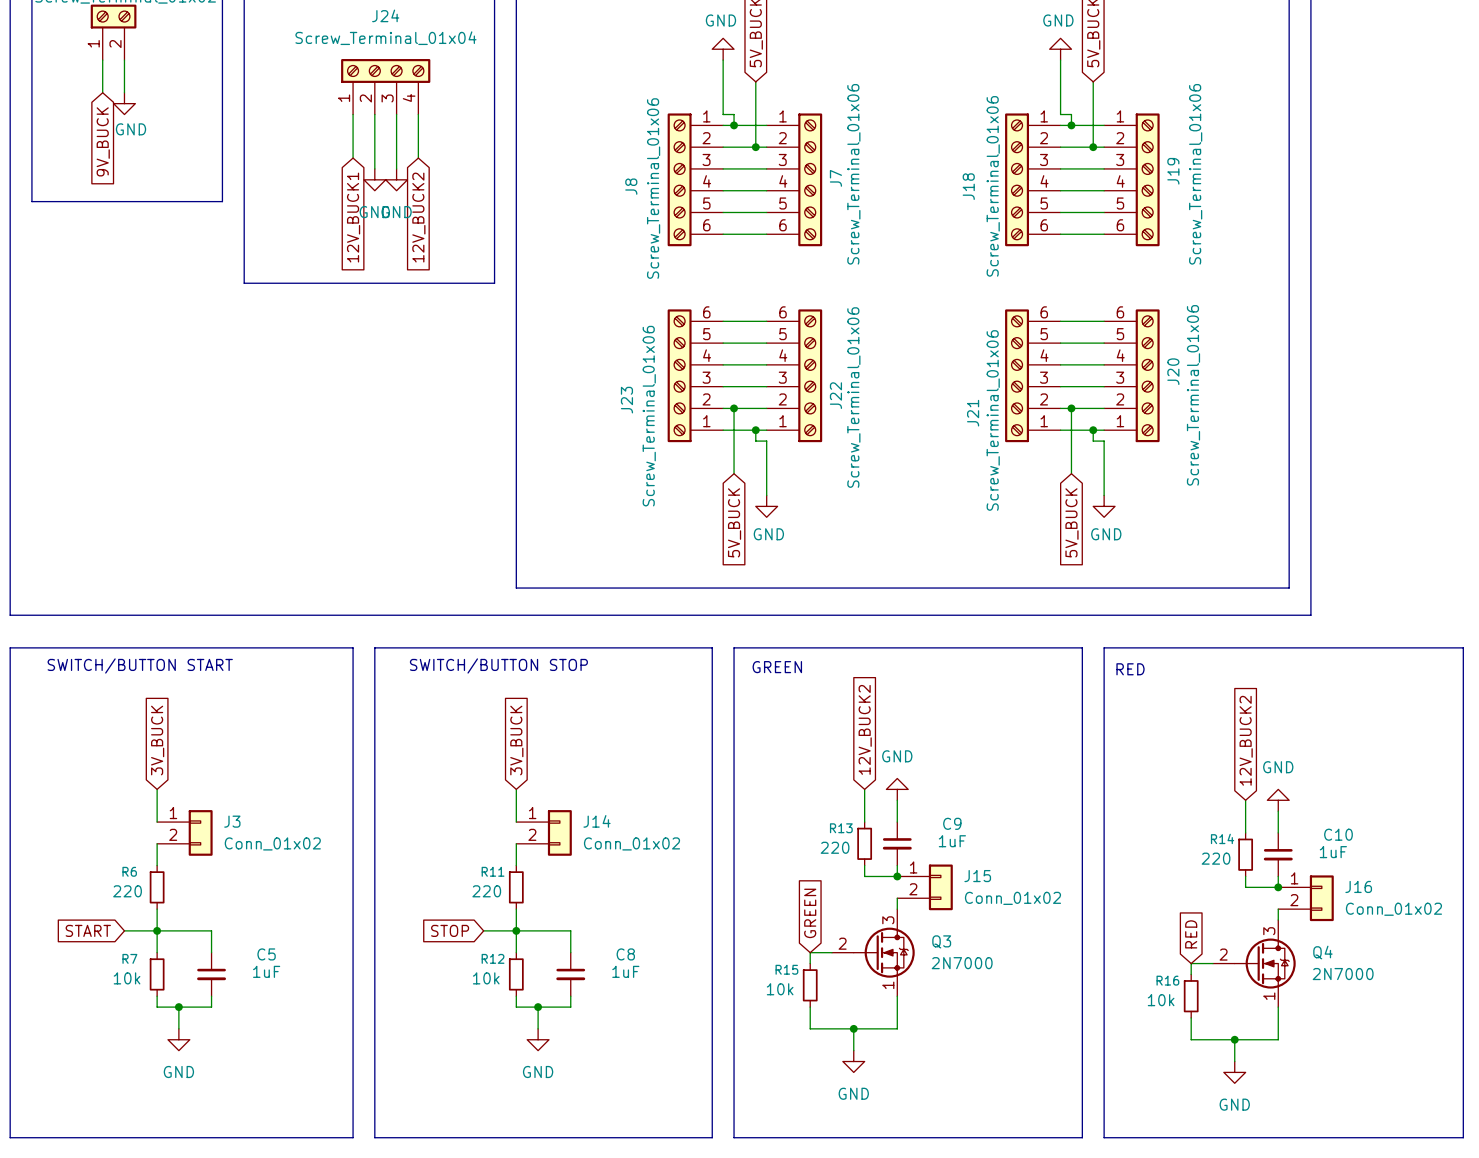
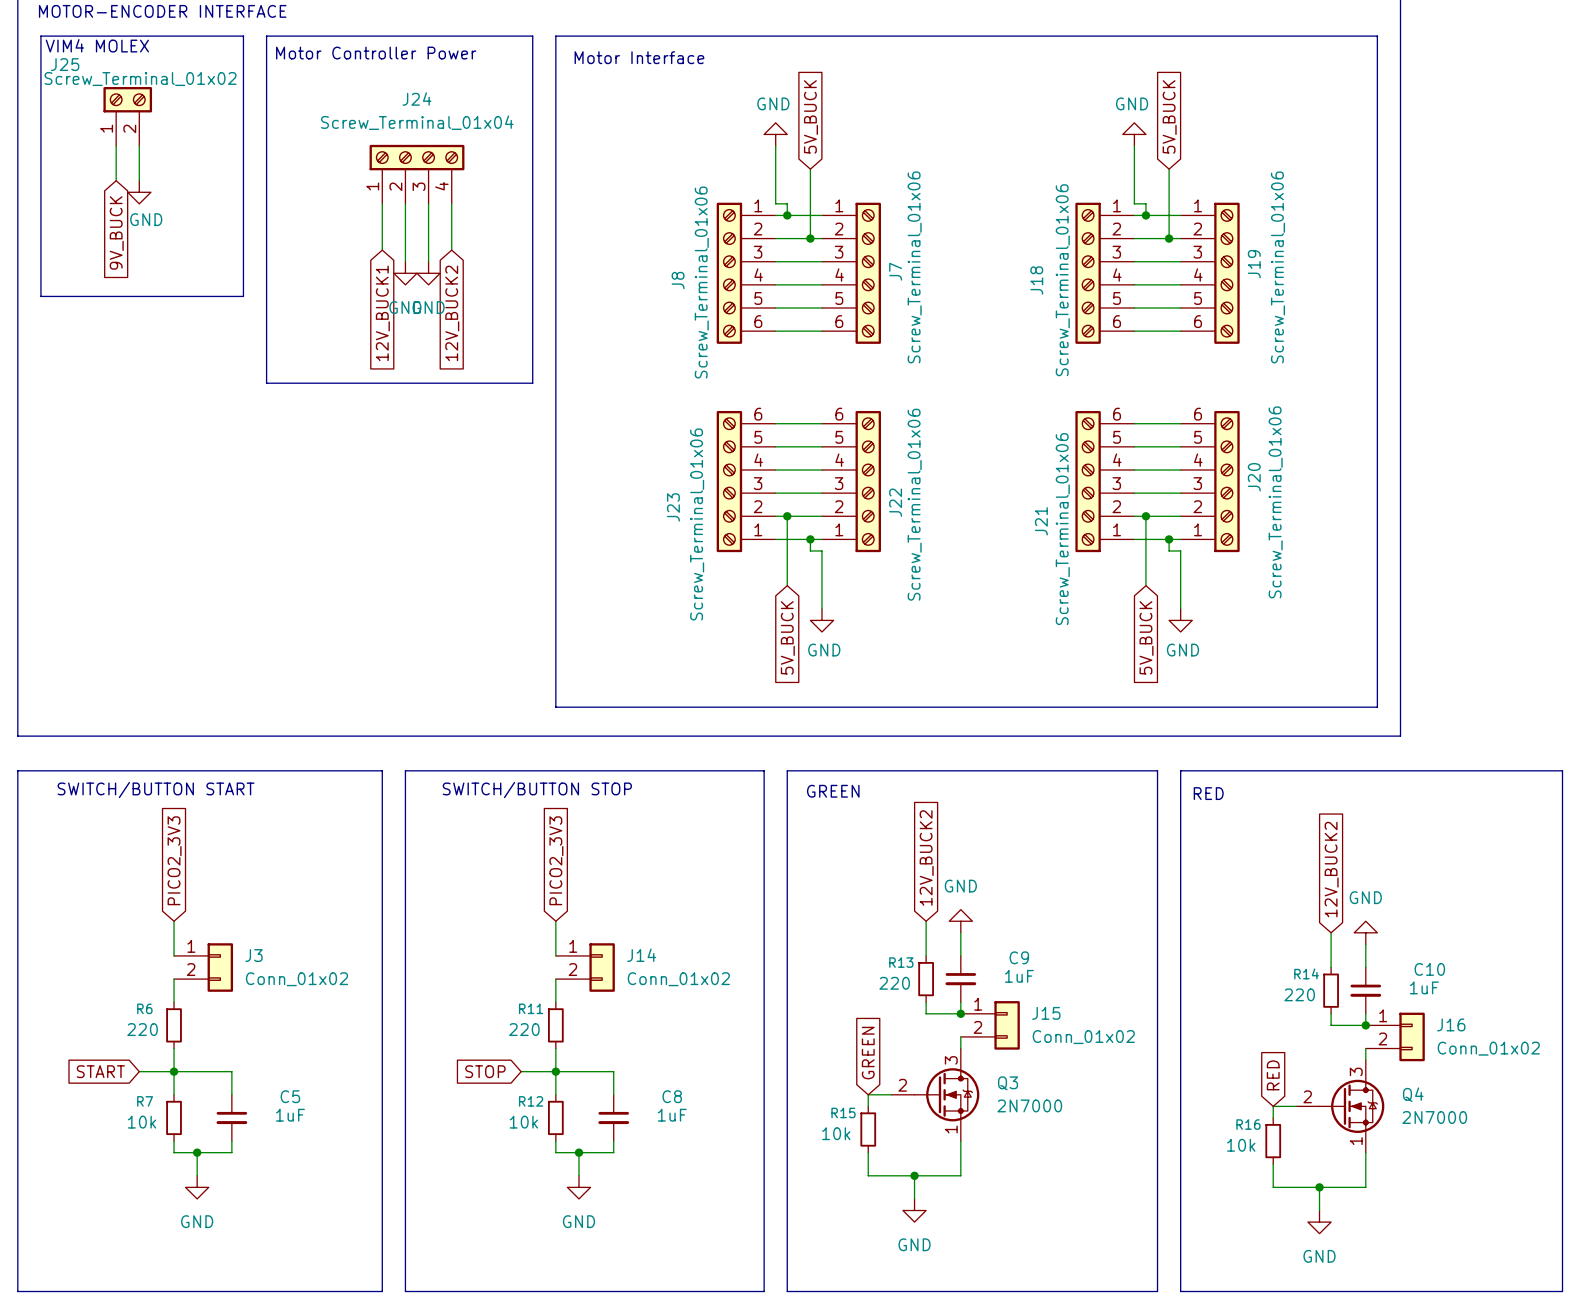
global label: 3V_BUCK (157, 740) -> PICO2_3V3 (174, 860)
global label: 3V_BUCK (516, 740) -> PICO2_3V3 (556, 860)

